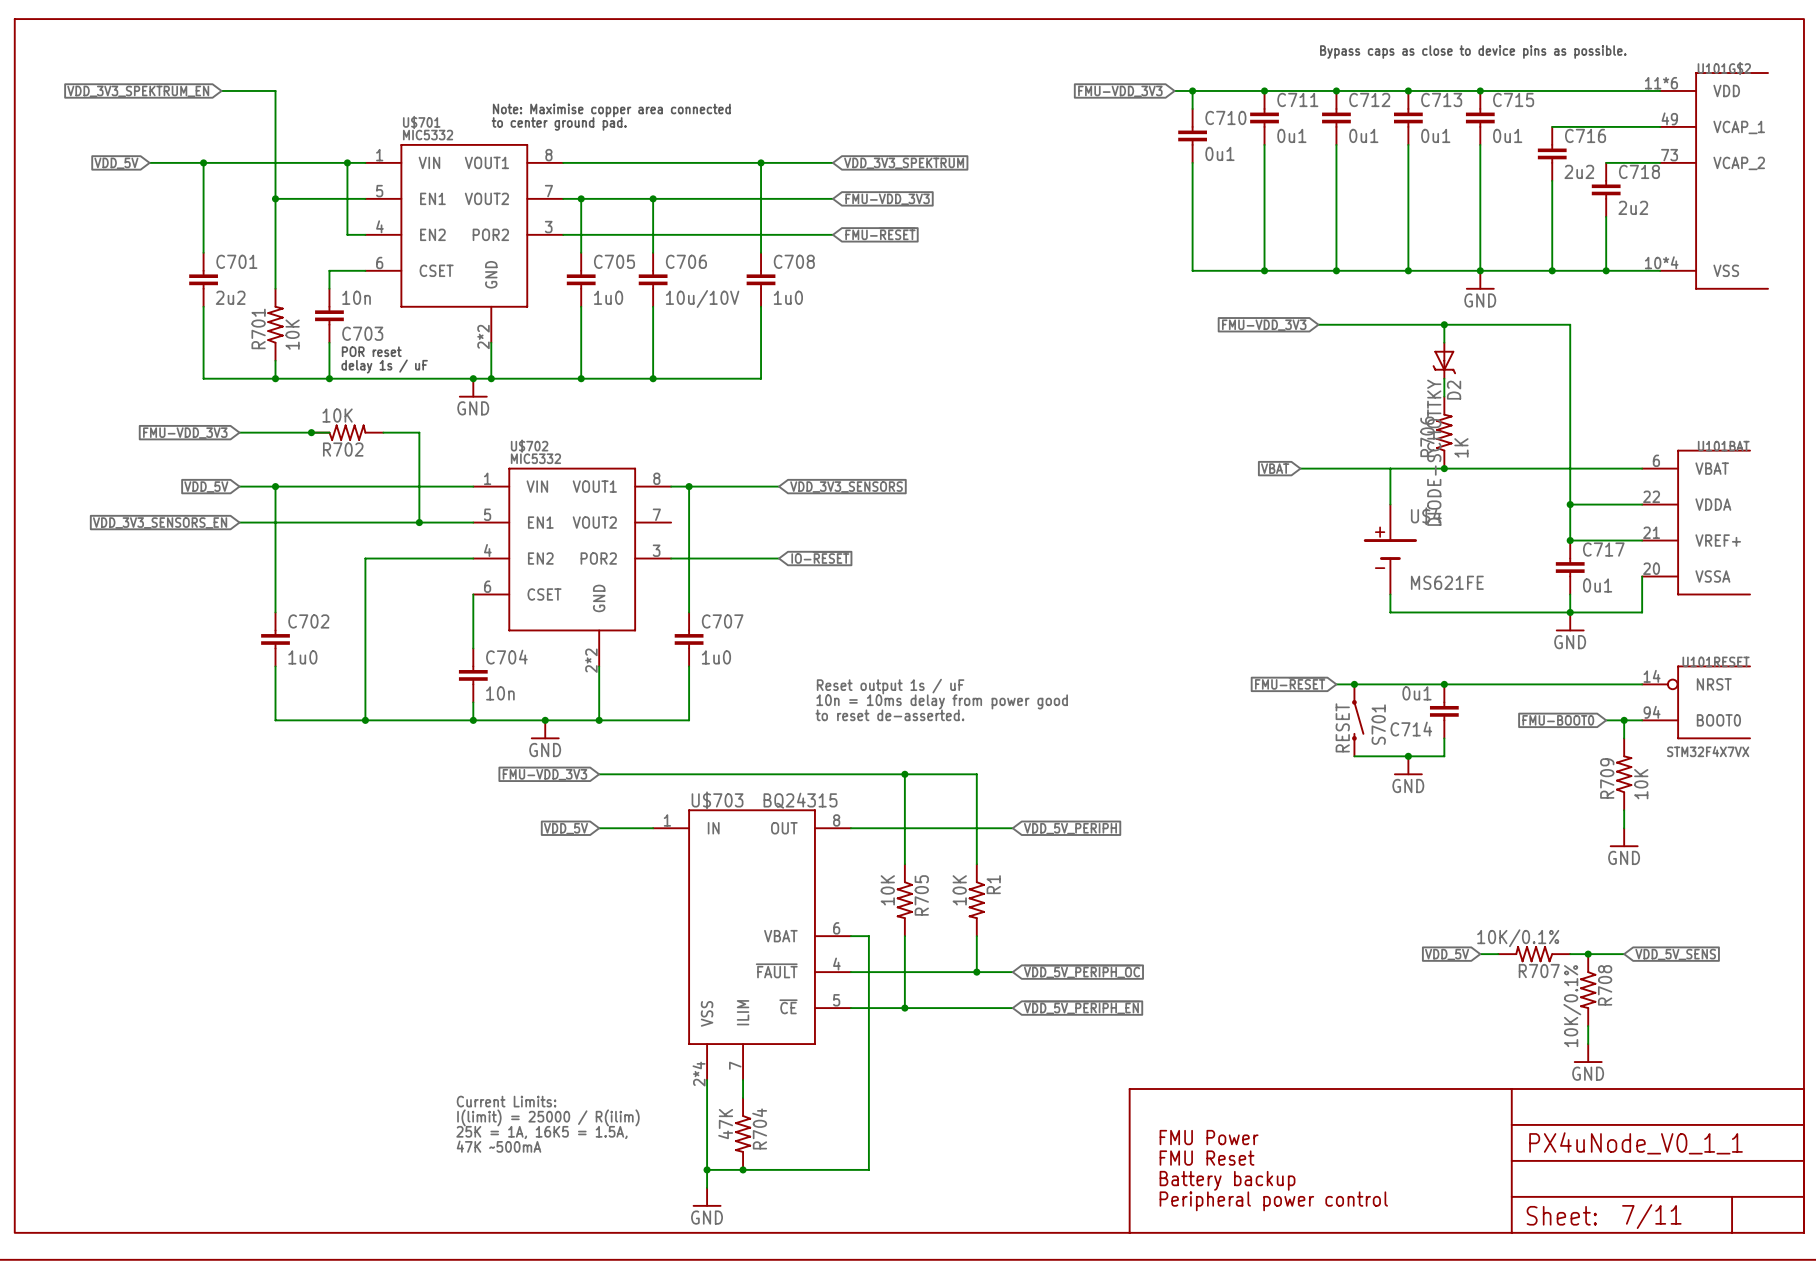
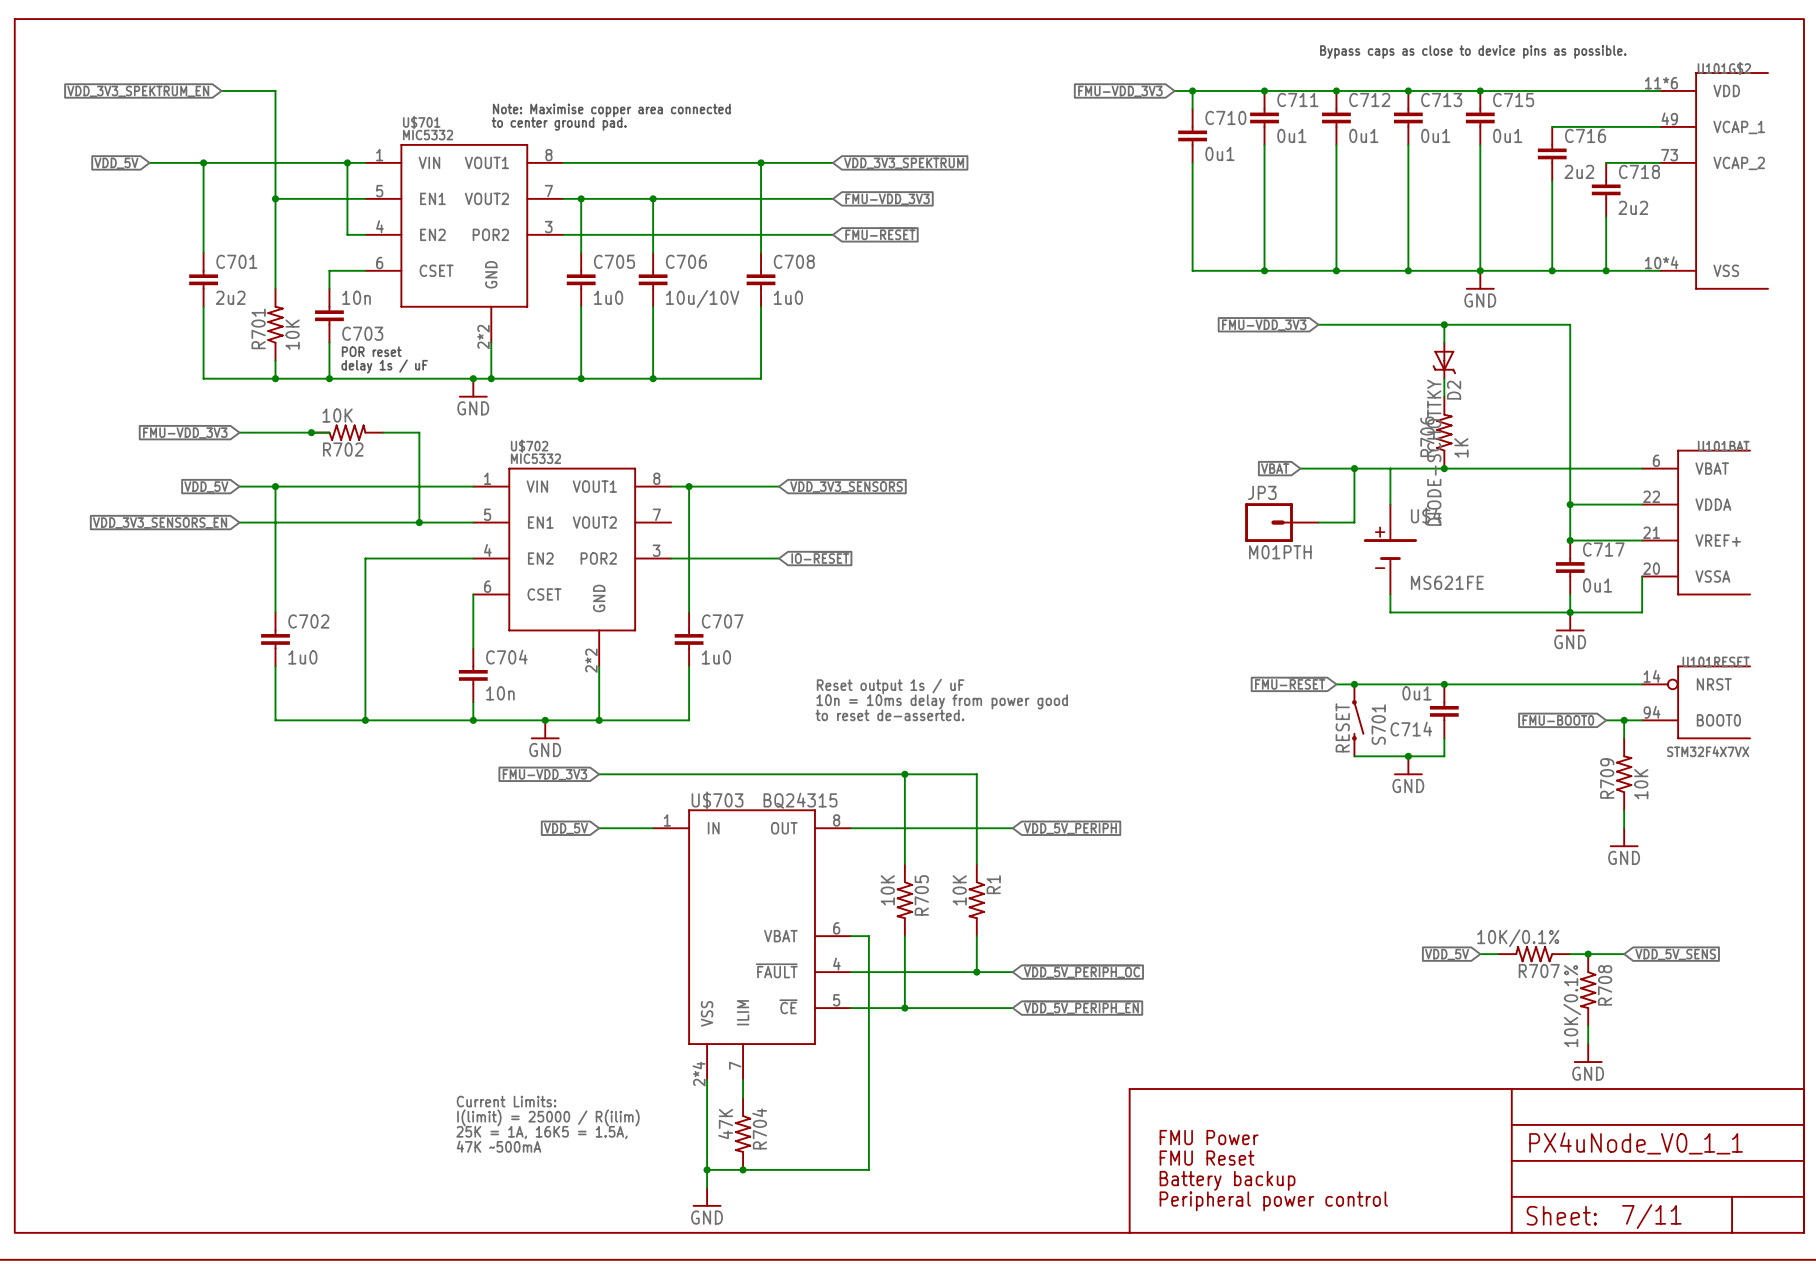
wire: none -> (1354, 468) (1354, 522) (1318, 522)
junction: none -> (1354, 468)
JP3: none -> M01PTH (1281, 522)

